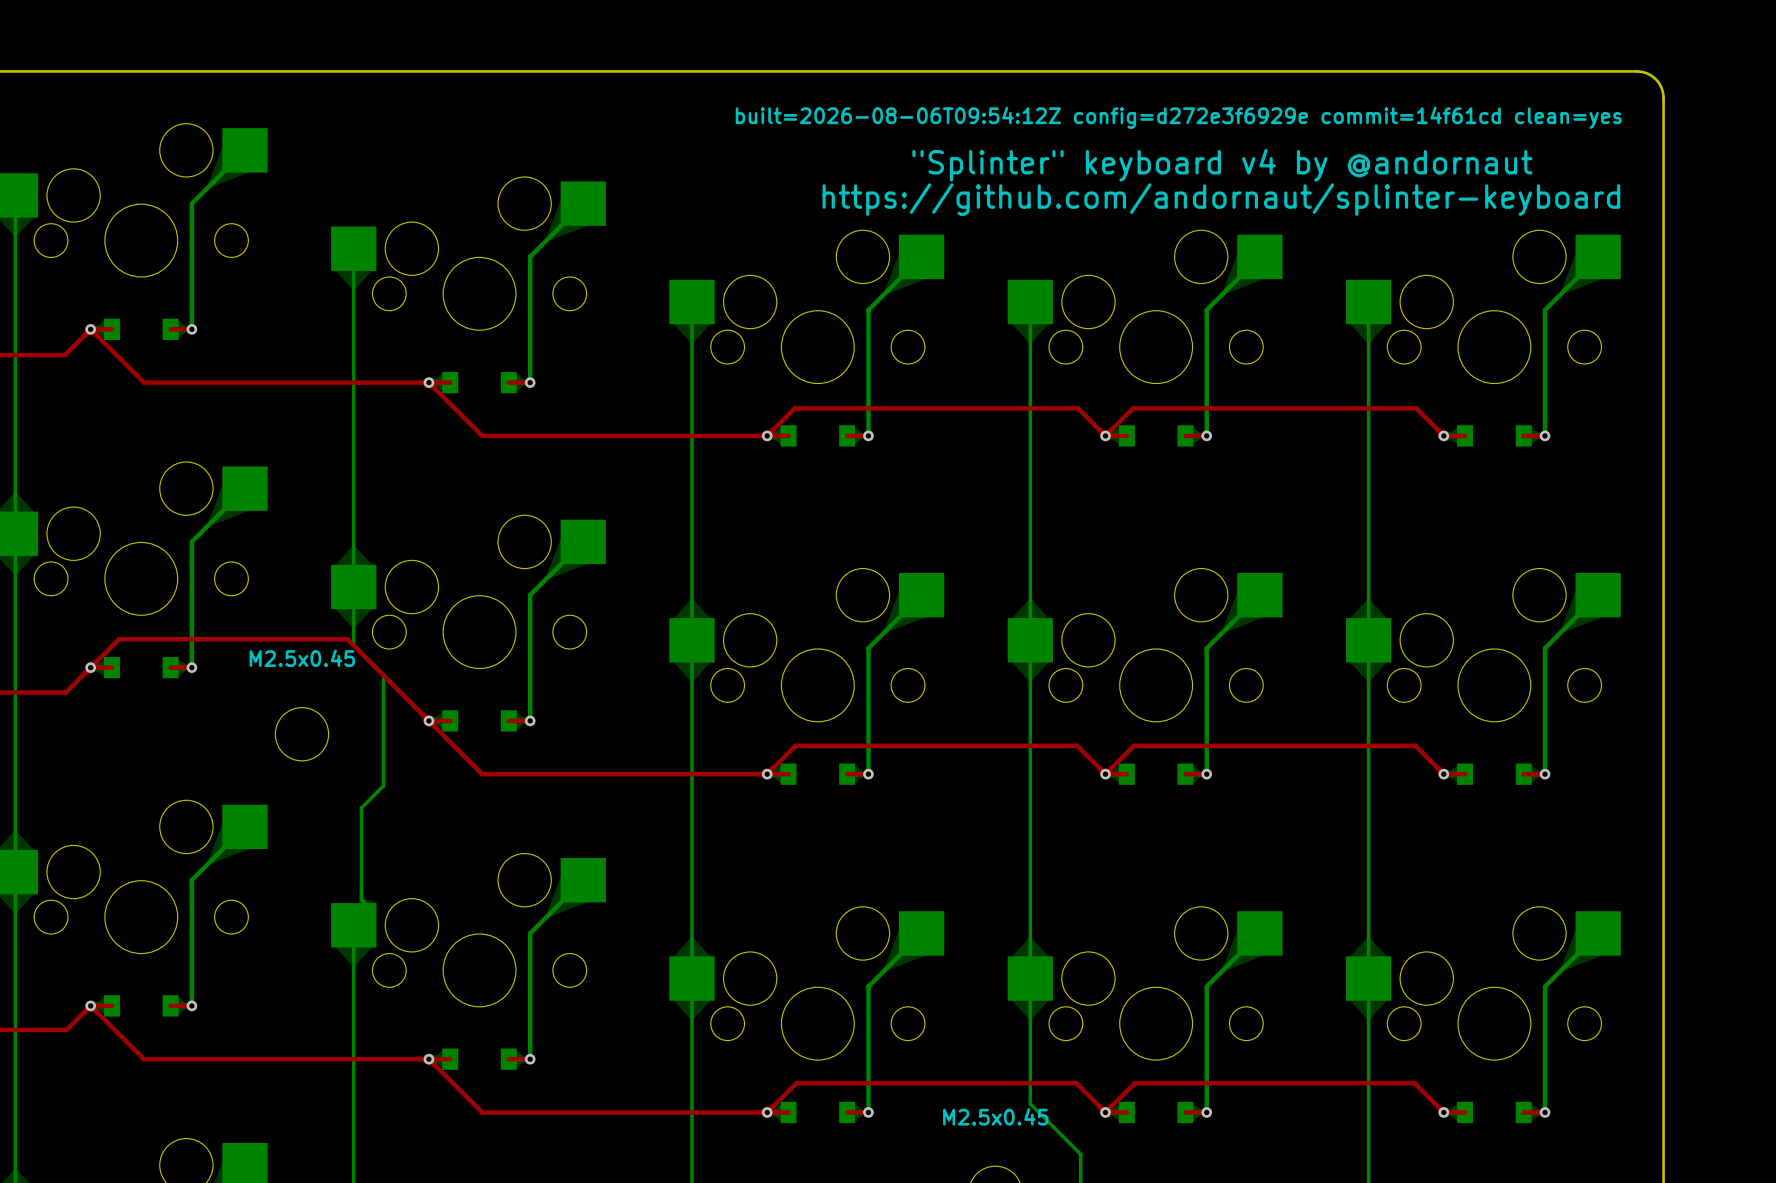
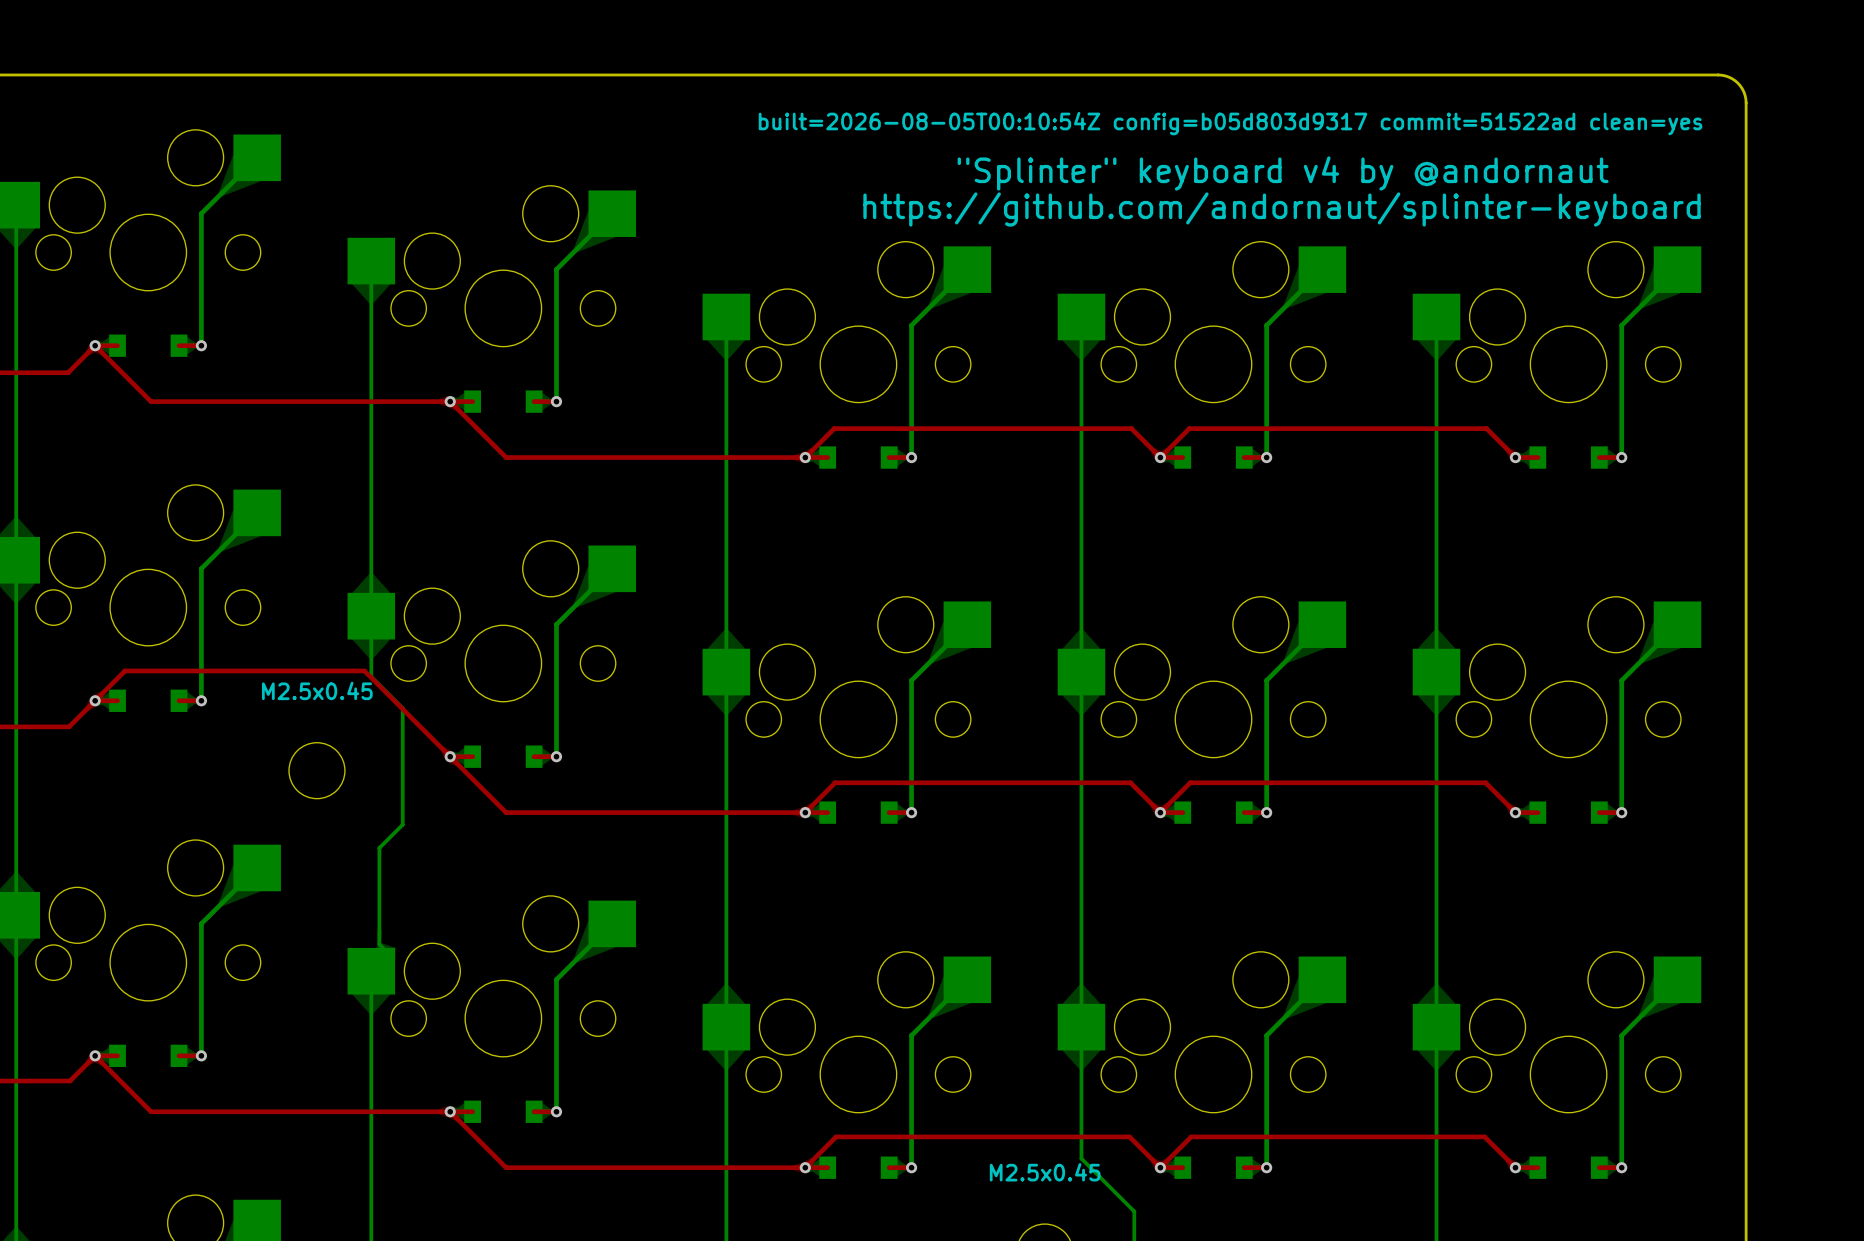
text: built=2026-08-06T09:54:12Z config=d272e3f6929e commit=14f61cd clean=yes (1178, 117) -> built=2026-08-05T00:10:54Z config=b05d803d9317 commit=51522ad clean=yes (1230, 123)

